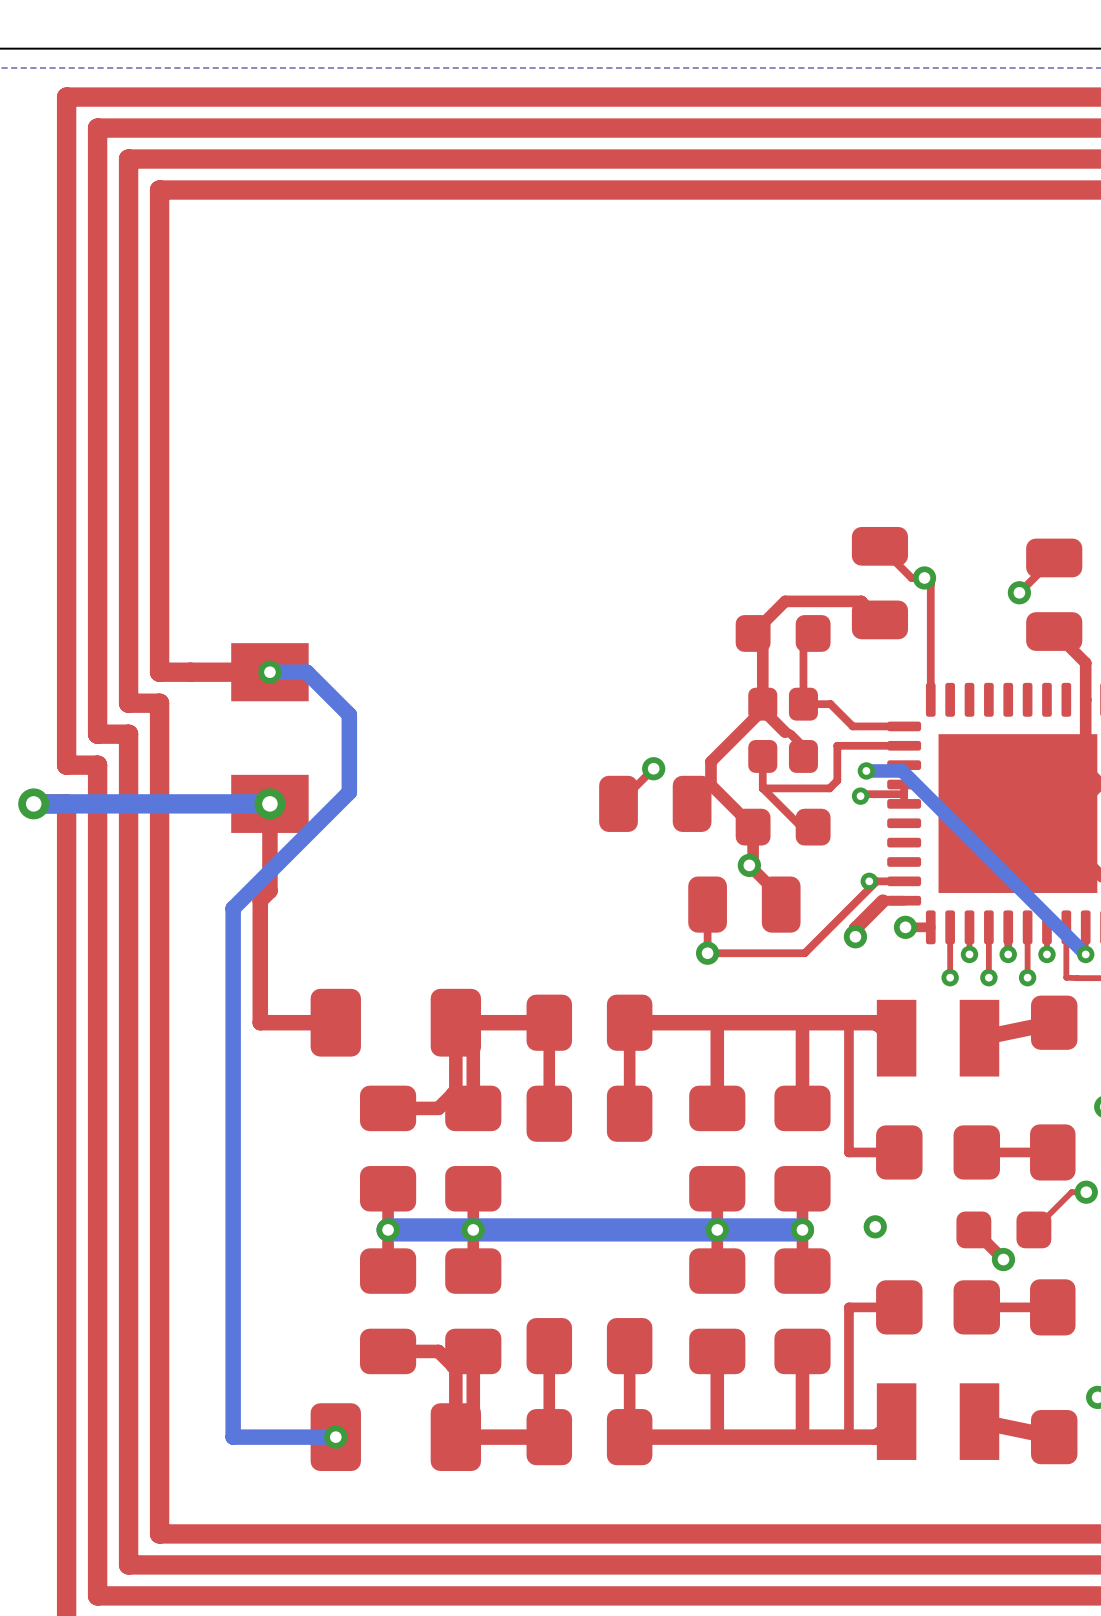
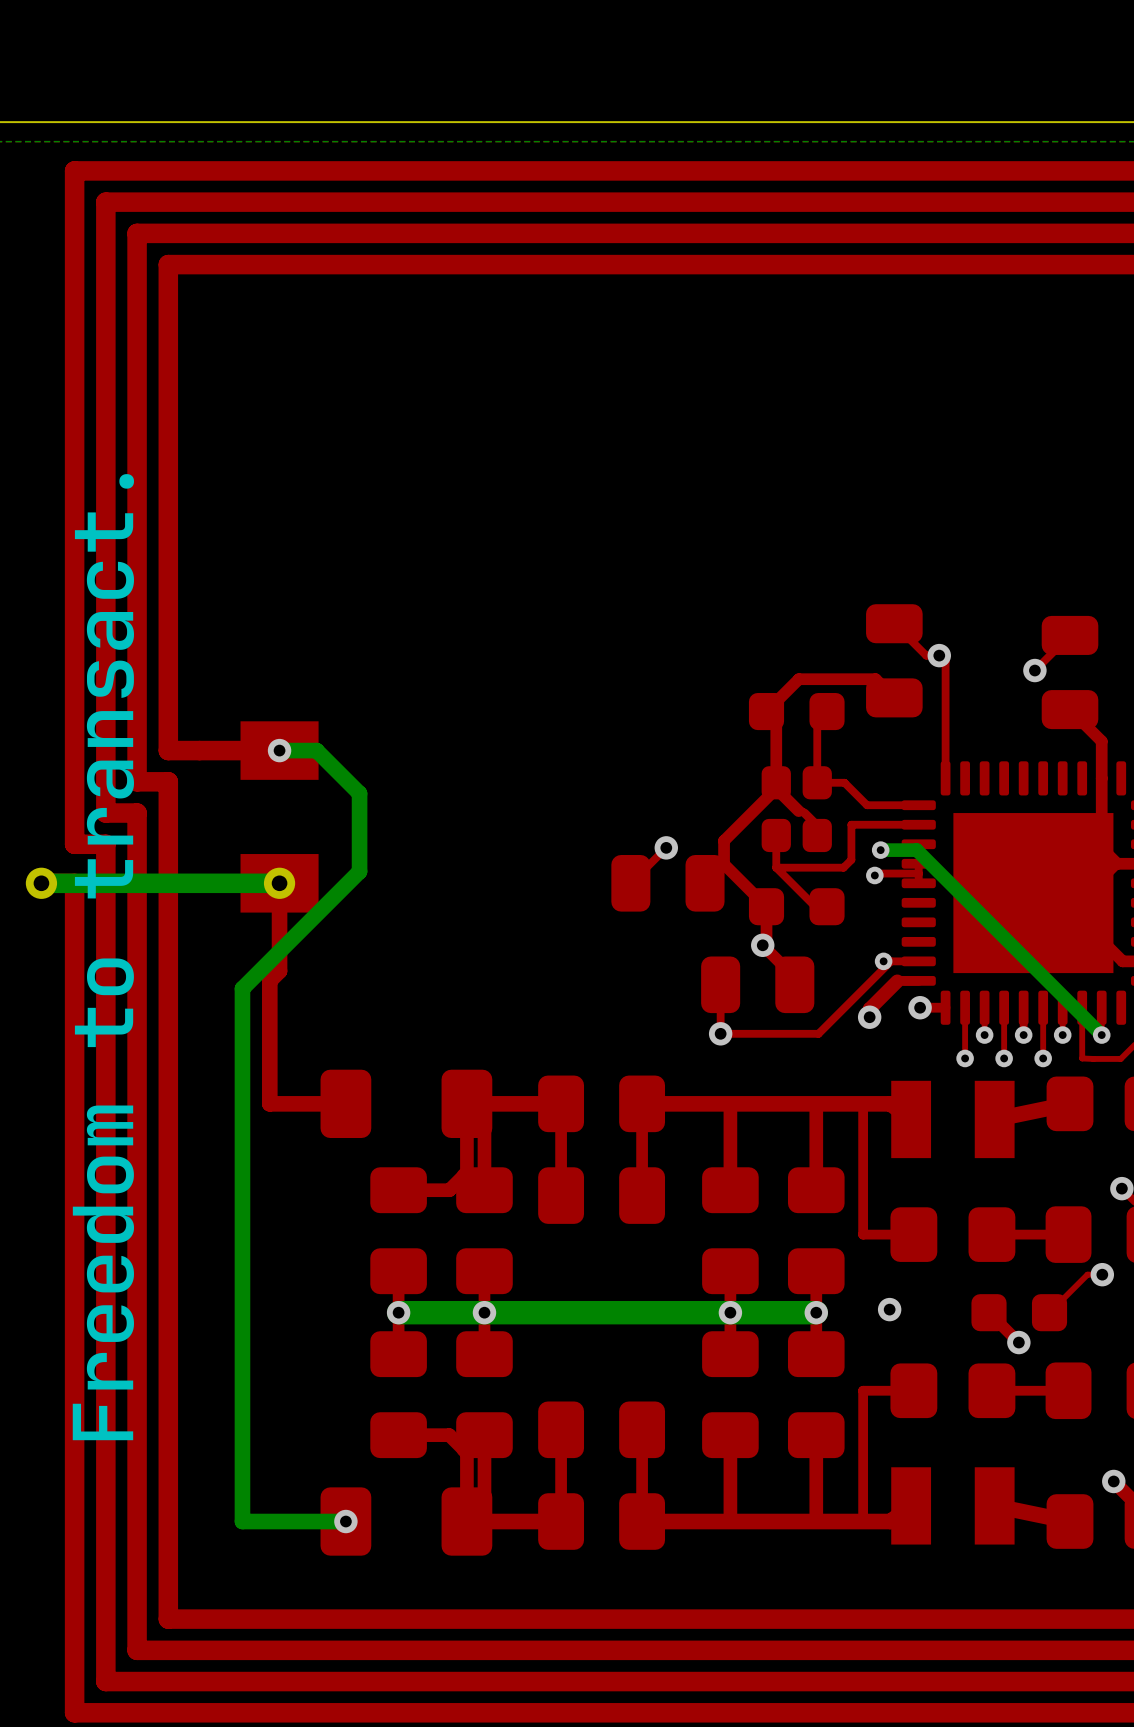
drawing: none -> [74, 474, 134, 899]
drawing: none -> [74, 958, 134, 1048]
drawing: none -> [72, 1105, 134, 1441]

